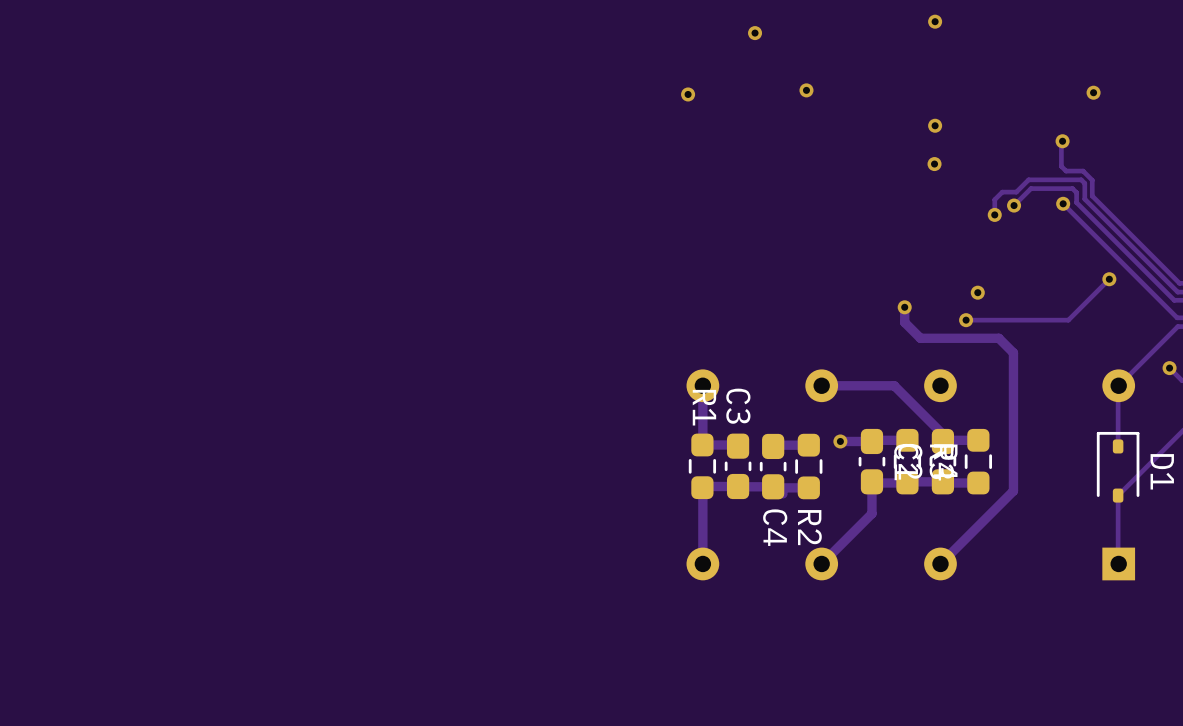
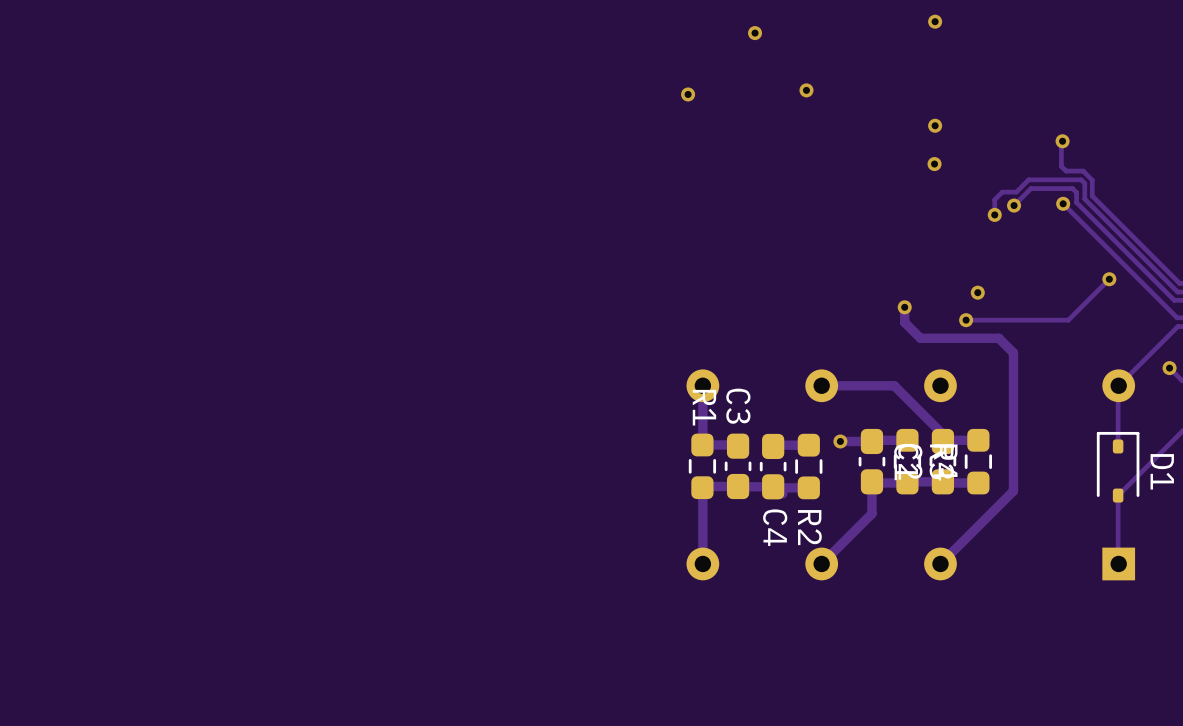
via: (1093, 92) -> none

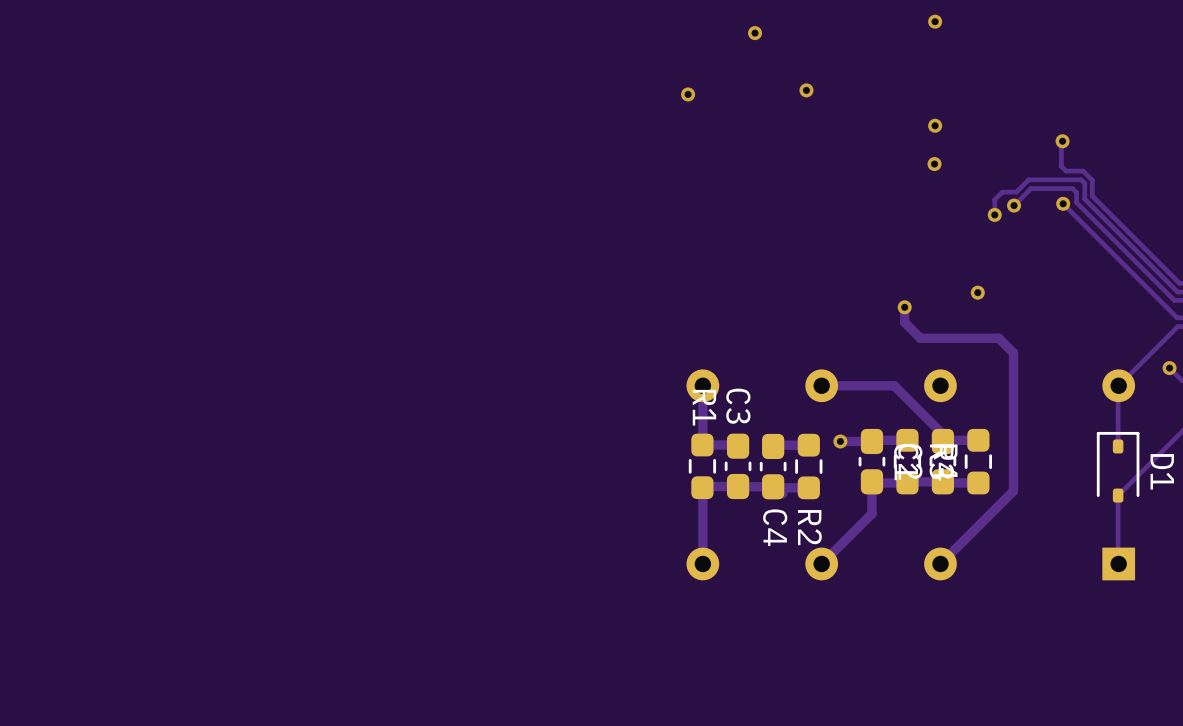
track: (1109, 279) (1068, 320) (966, 320) -> none
via: (1109, 279) -> none
via: (966, 320) -> none

